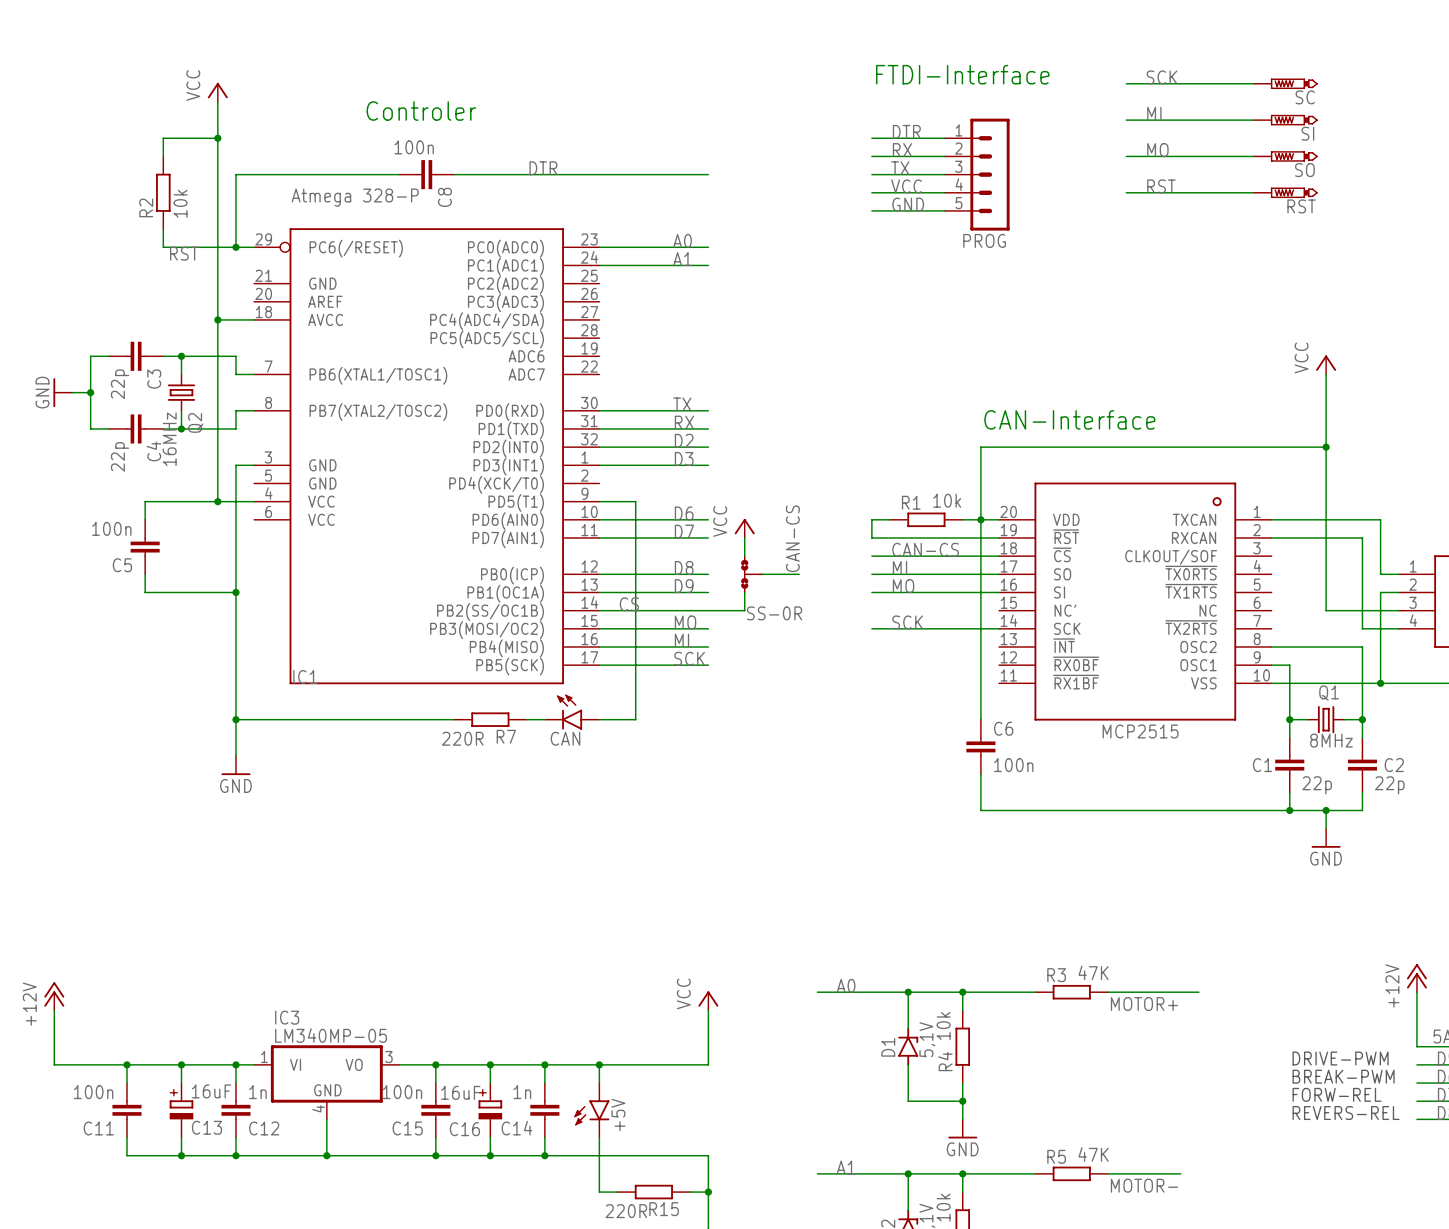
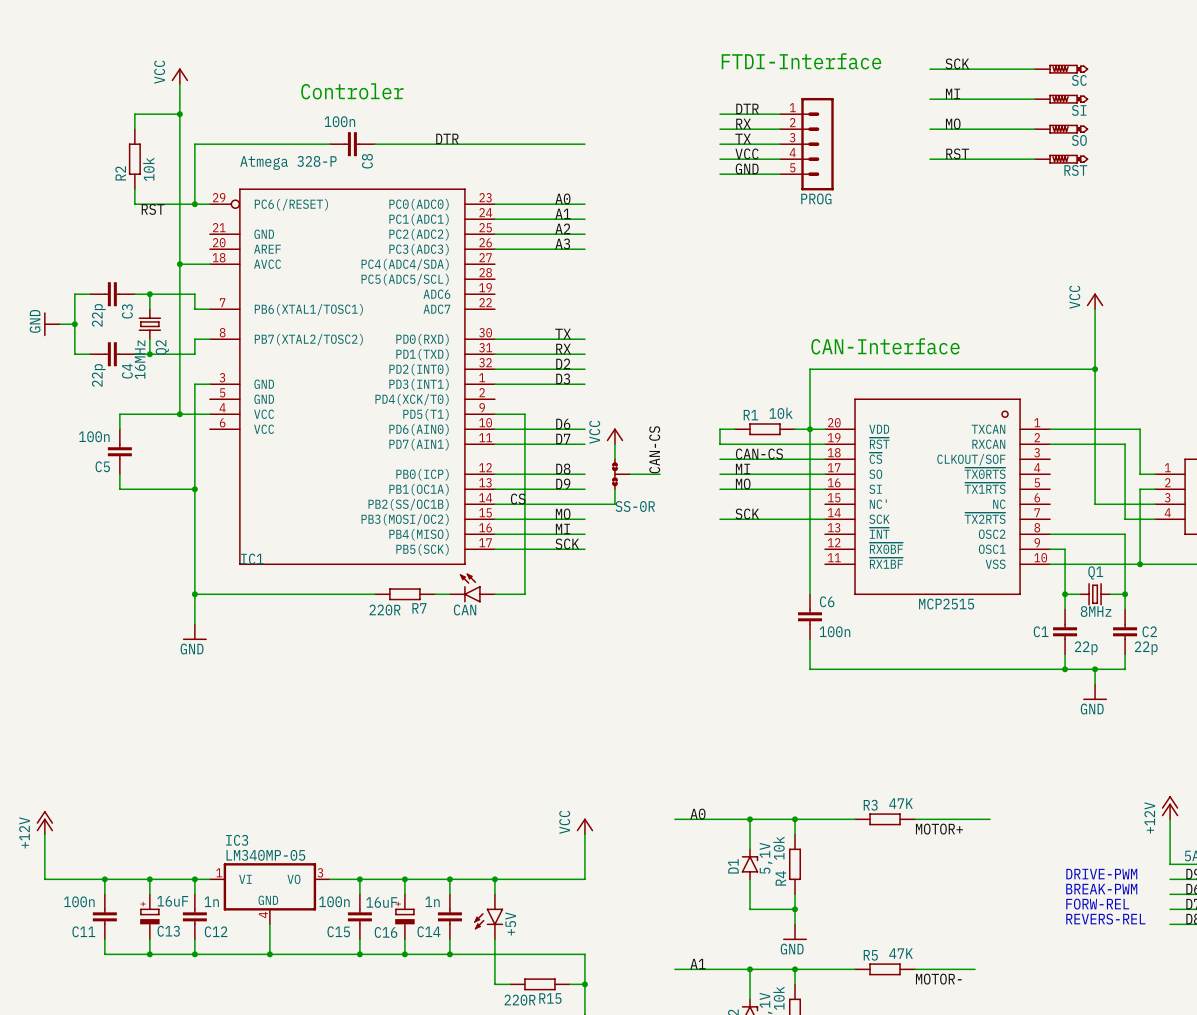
label: none -> A2 (562, 228)
wire: none -> (494, 234) (584, 234)
label: none -> A3 (562, 243)
wire: none -> (494, 249) (584, 249)

